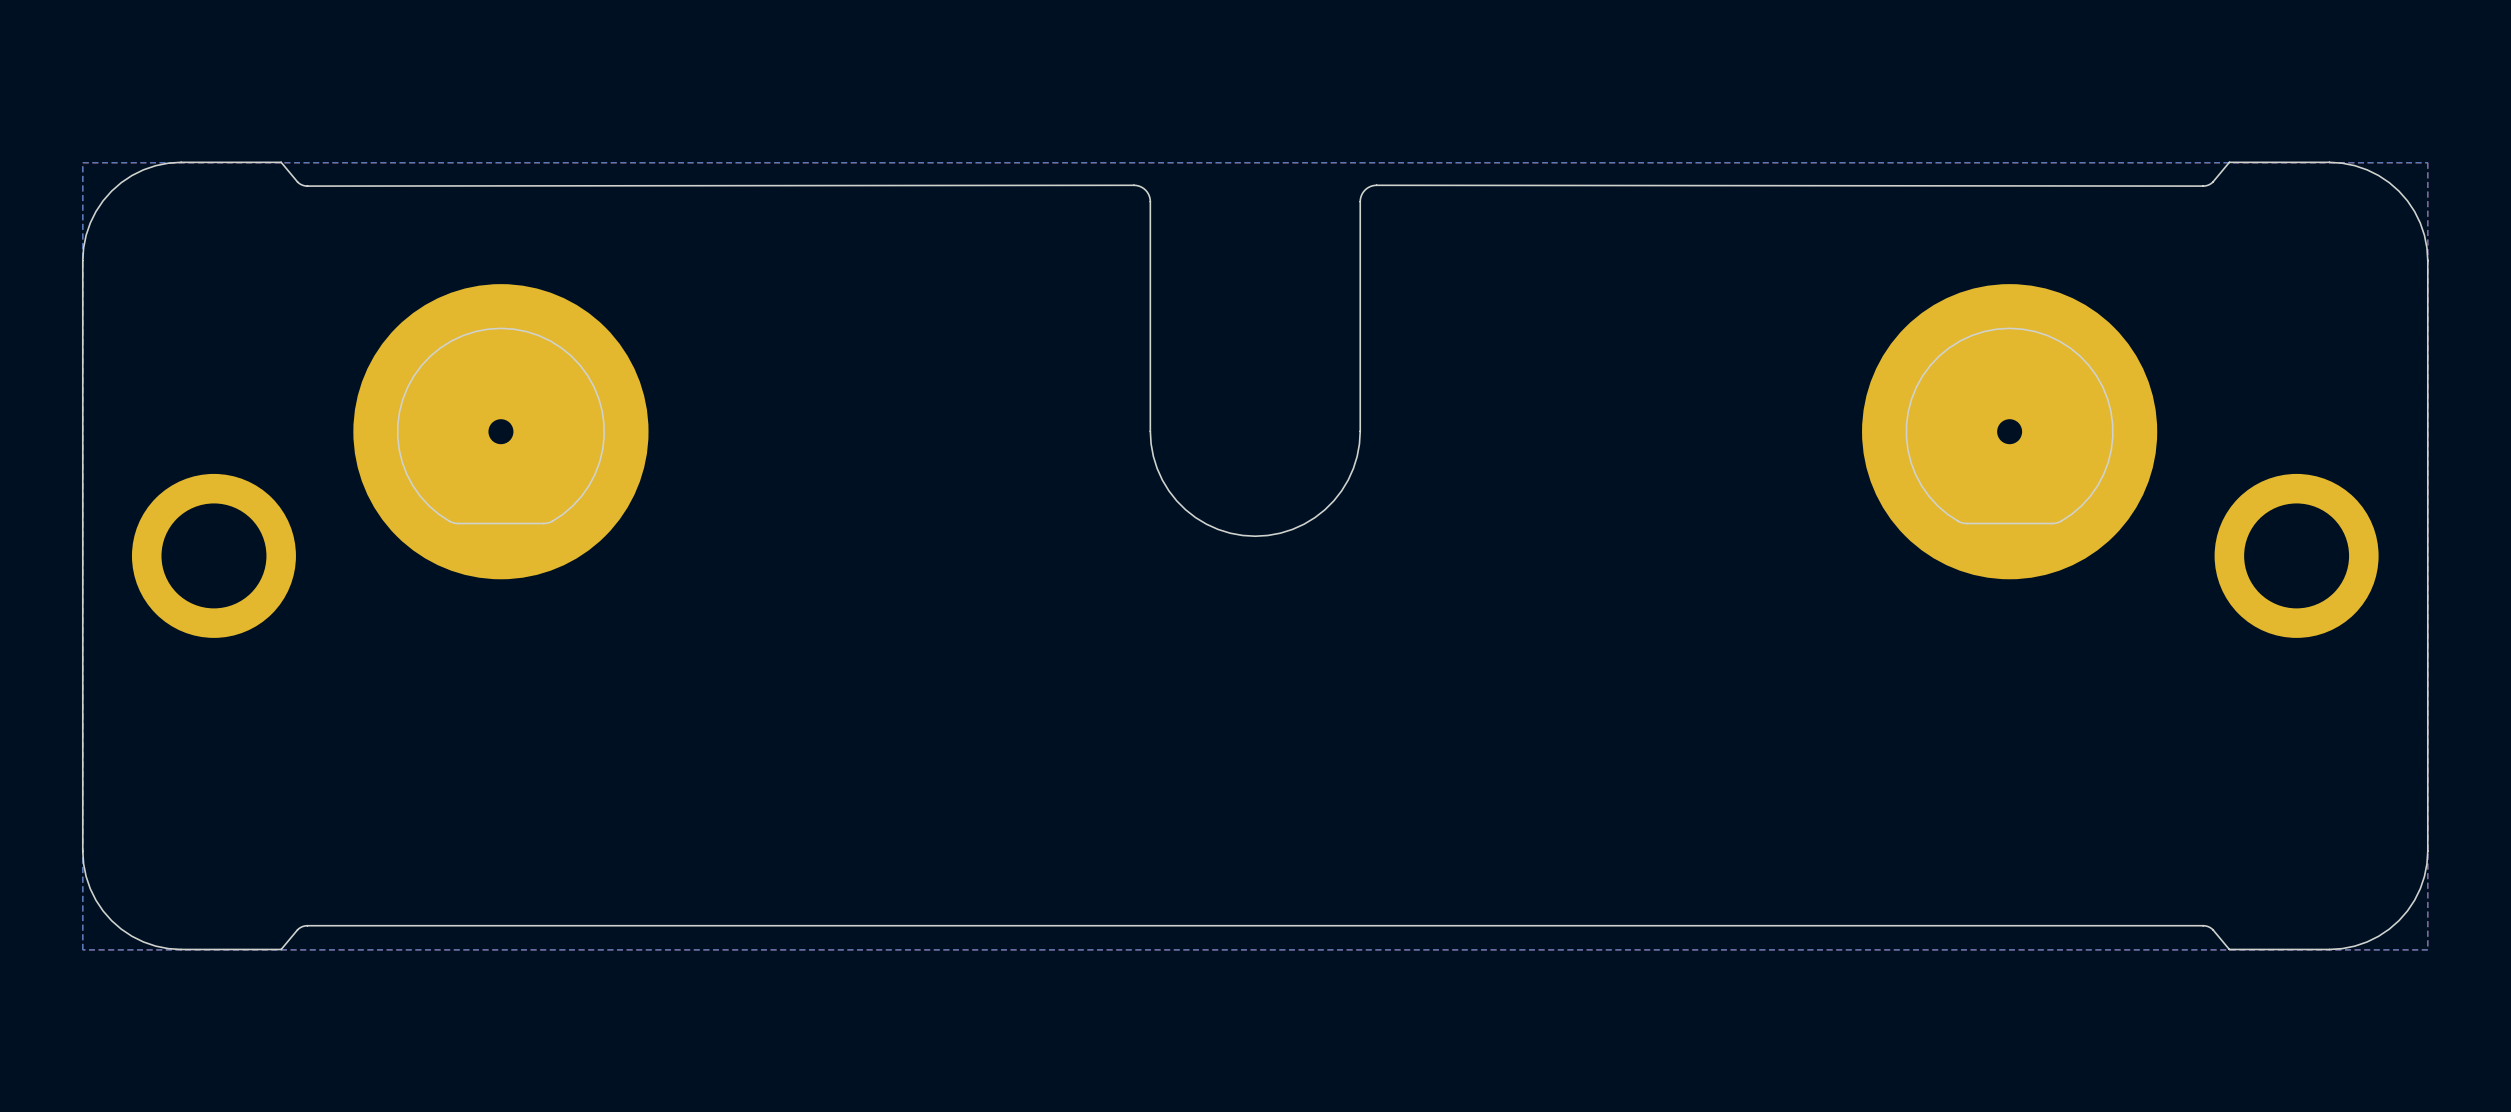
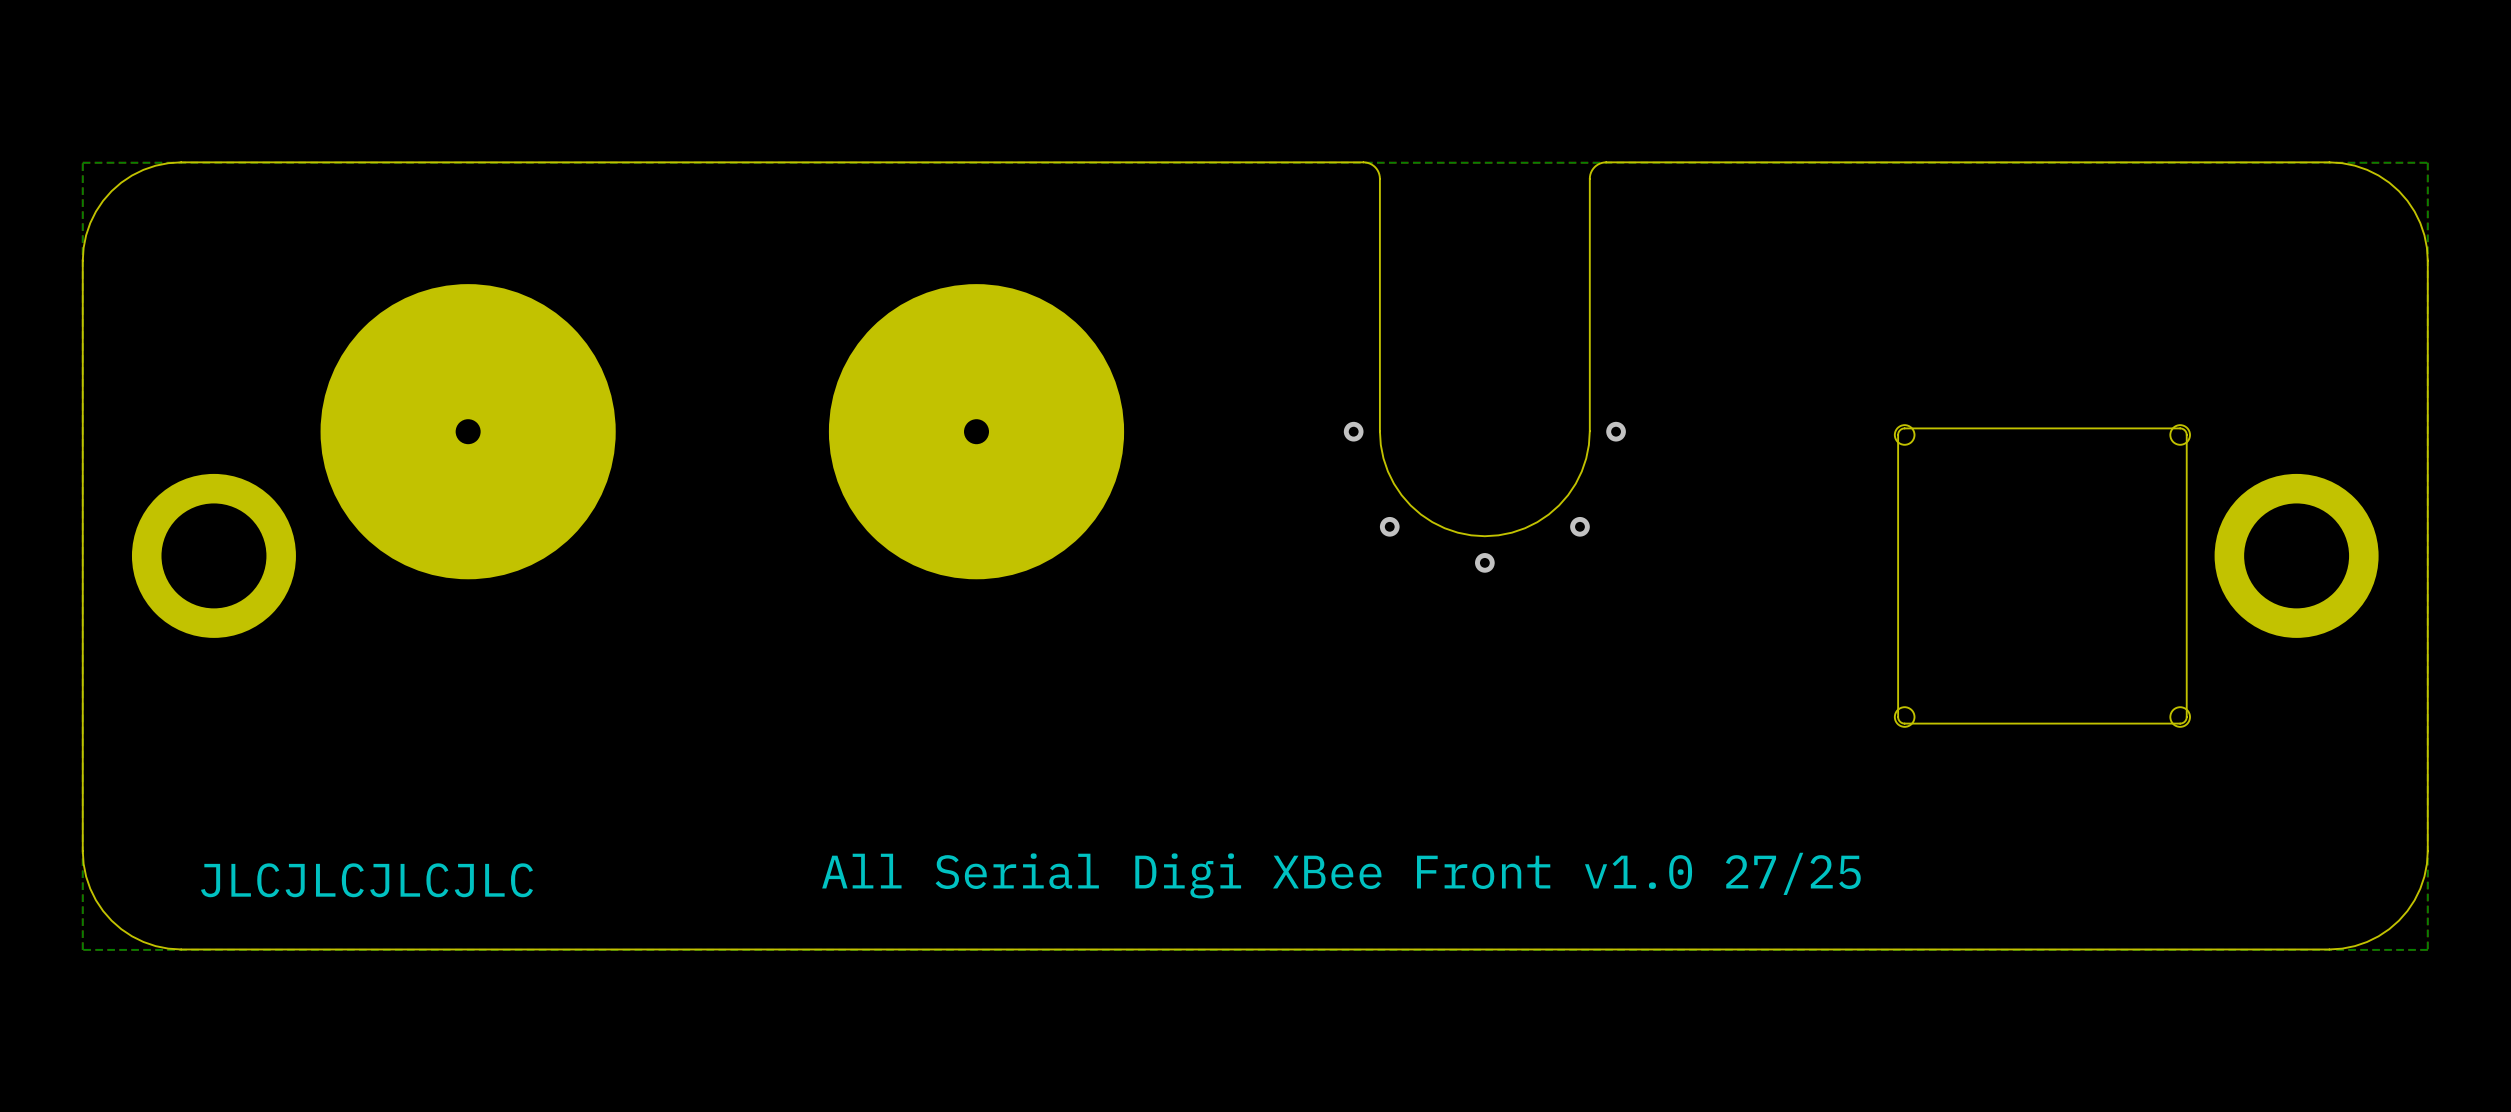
part footprint: [81, 161, 2429, 951] -> [81, 161, 2429, 951]
part position: (500, 431) -> (468, 431)
part: none -> (976, 431)
via: none -> (1353, 431)
via: none -> (1616, 431)
part: (2009, 431) -> none
via: none -> (1389, 526)
via: none -> (1579, 526)
via: none -> (1484, 562)
part: none -> (2042, 576)
text: none -> All Serial Digi XBee Front v1.0 27/25 (1341, 875)
text: none -> JLCJLCJLCJLC (367, 880)

